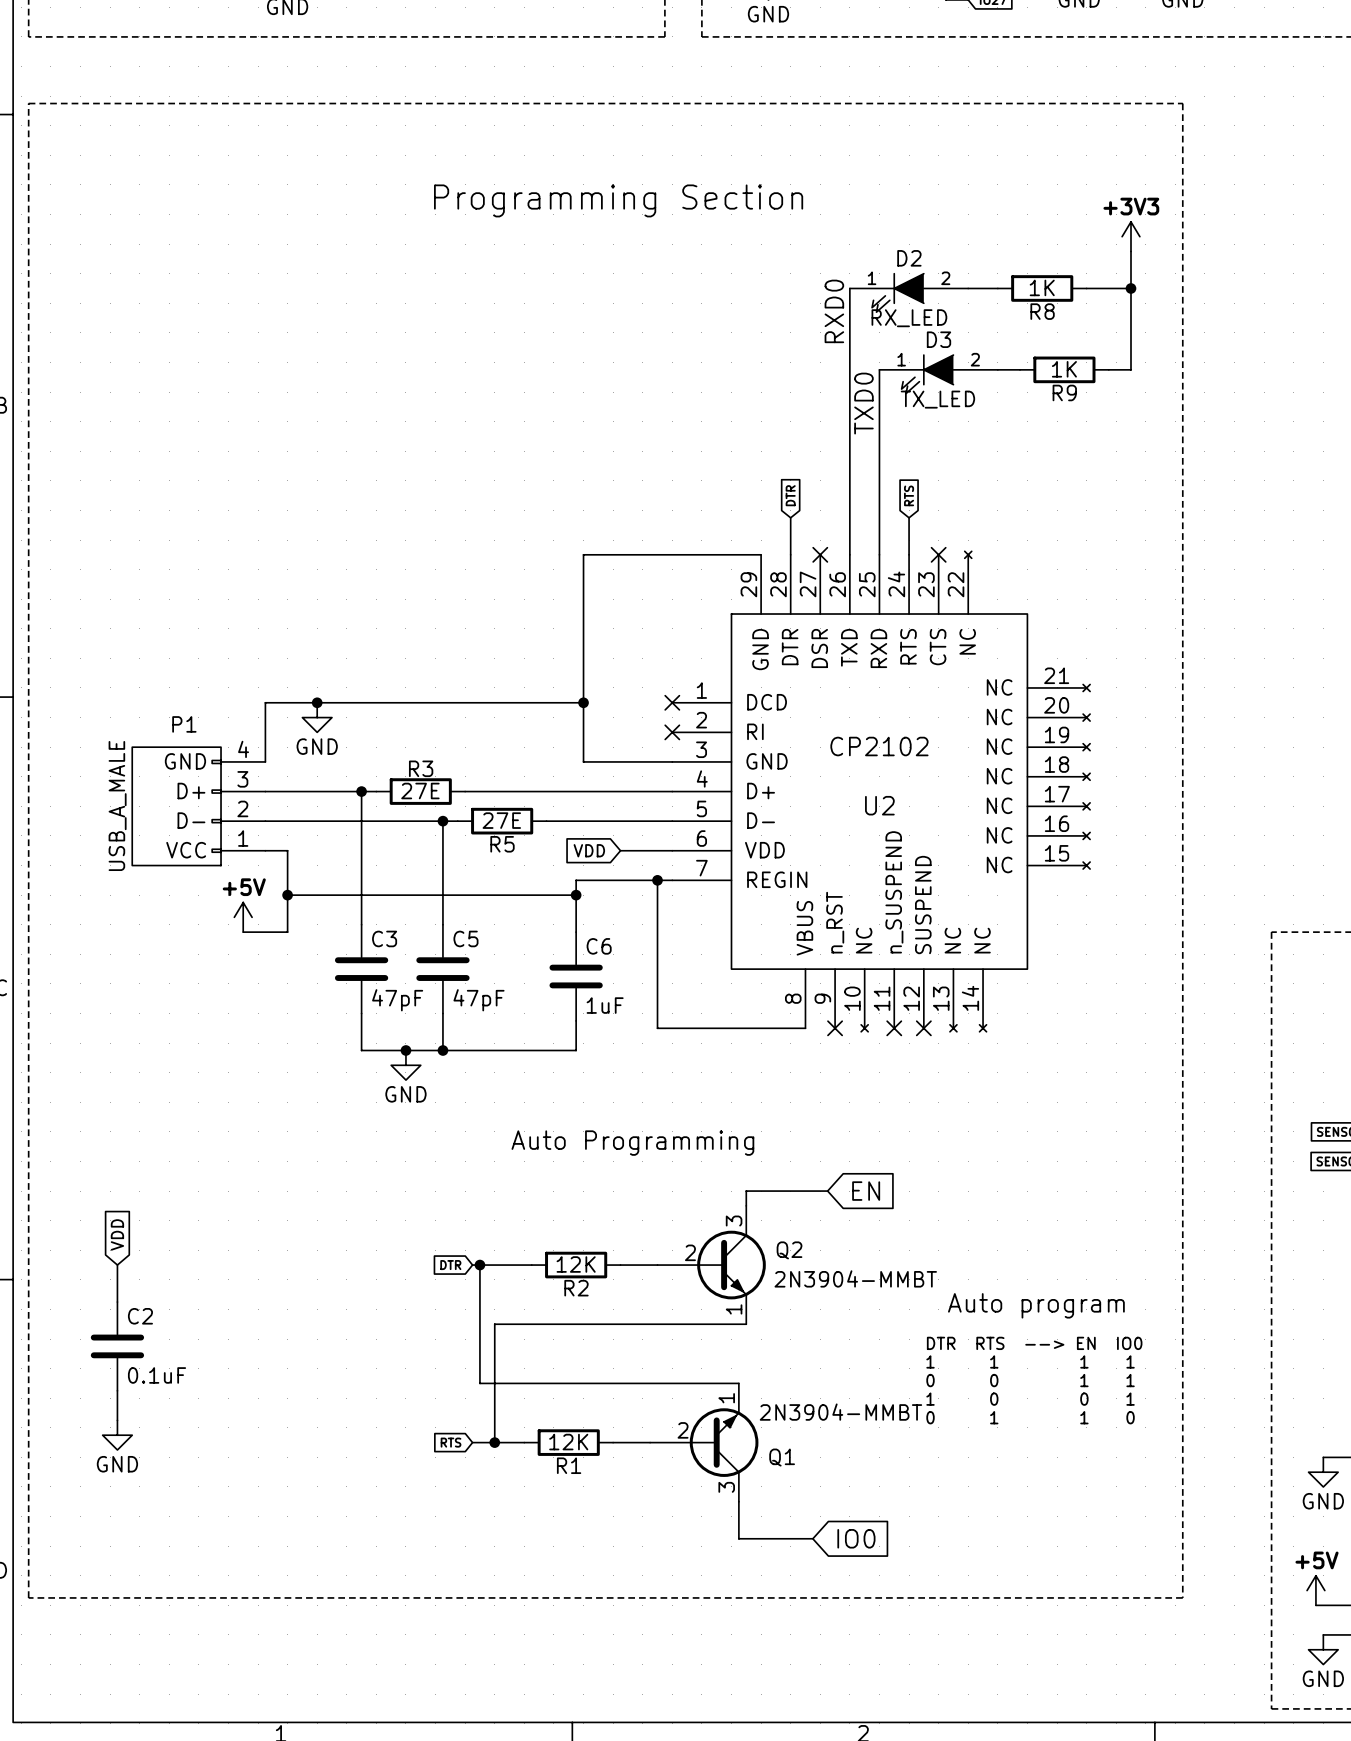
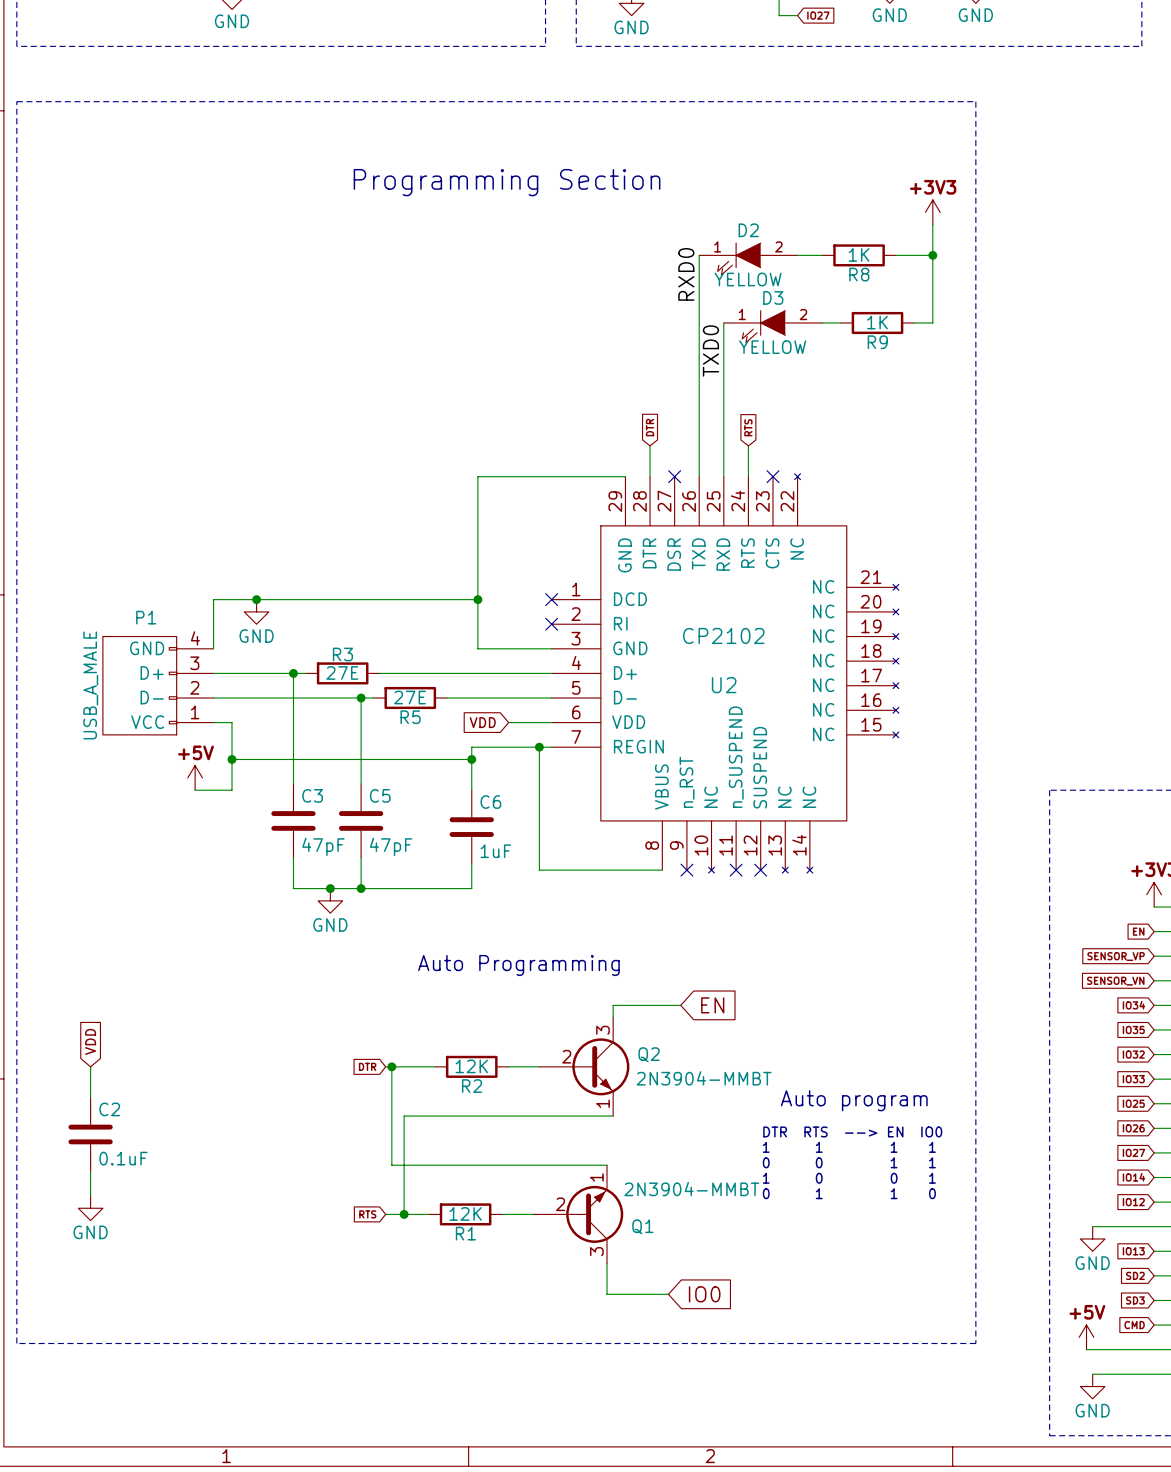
D2 value: RX_LED (909, 318) -> YELLOW (748, 279)
D3 value: TX_LED (937, 399) -> YELLOW (772, 347)

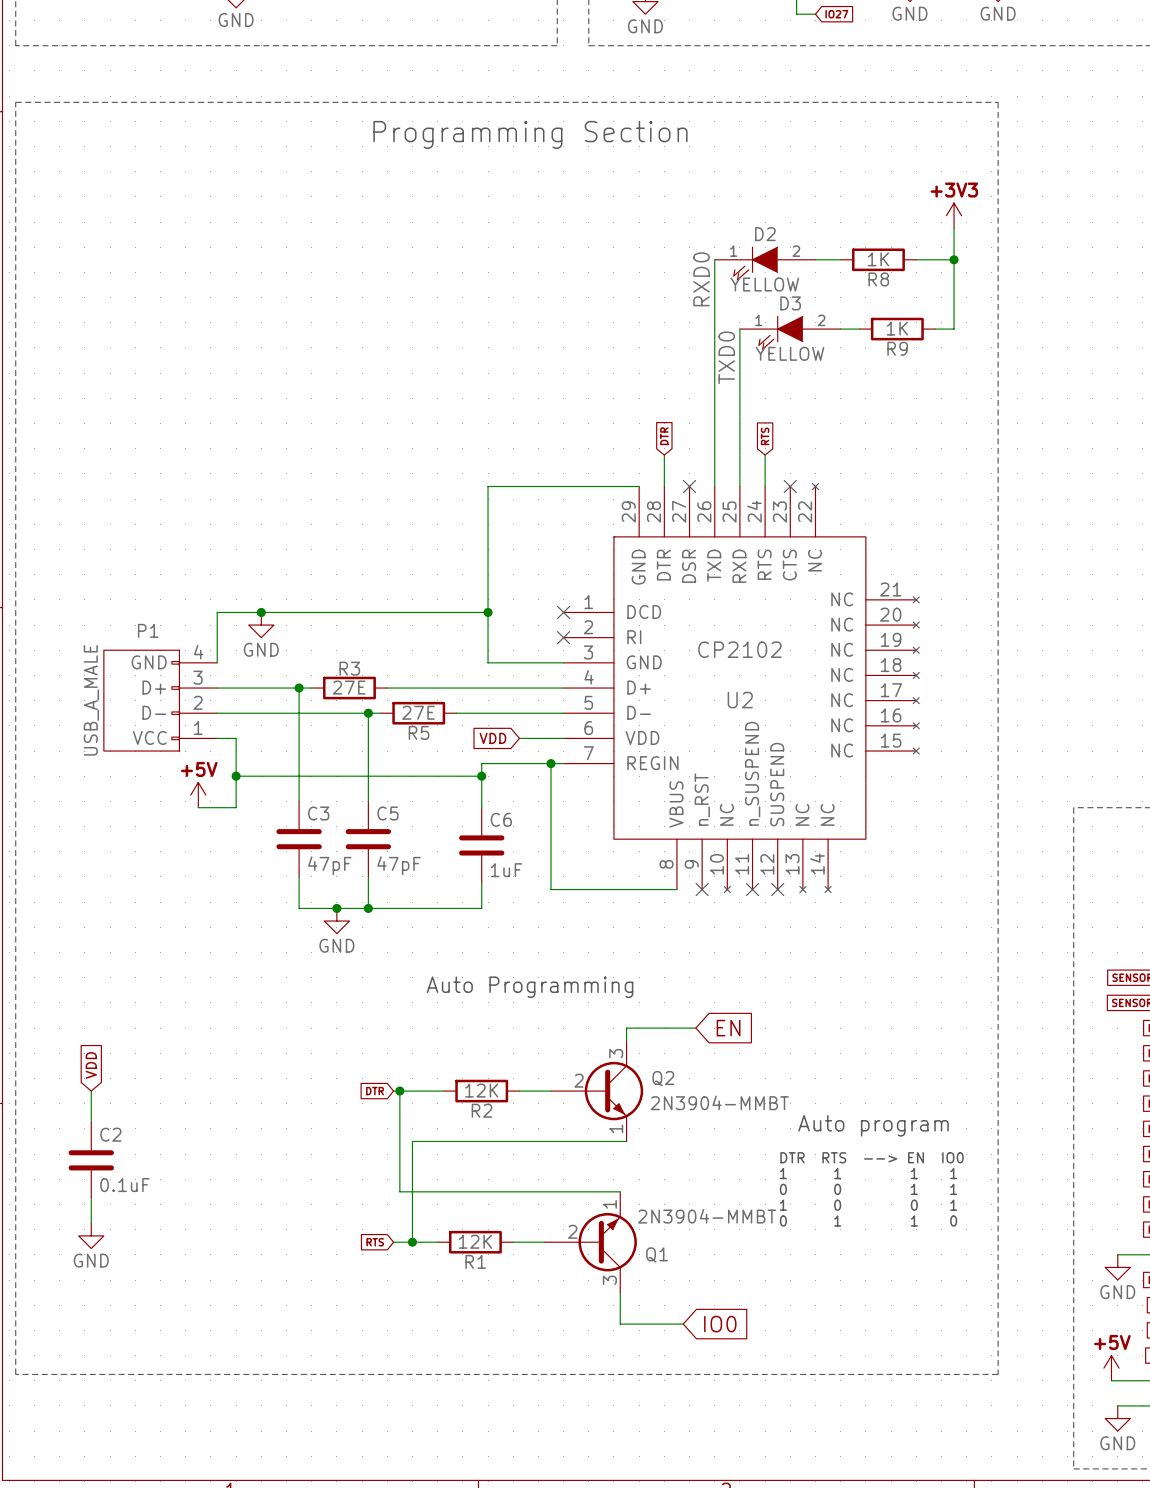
text position: Programming Section (507, 182) -> Programming Section (530, 134)

